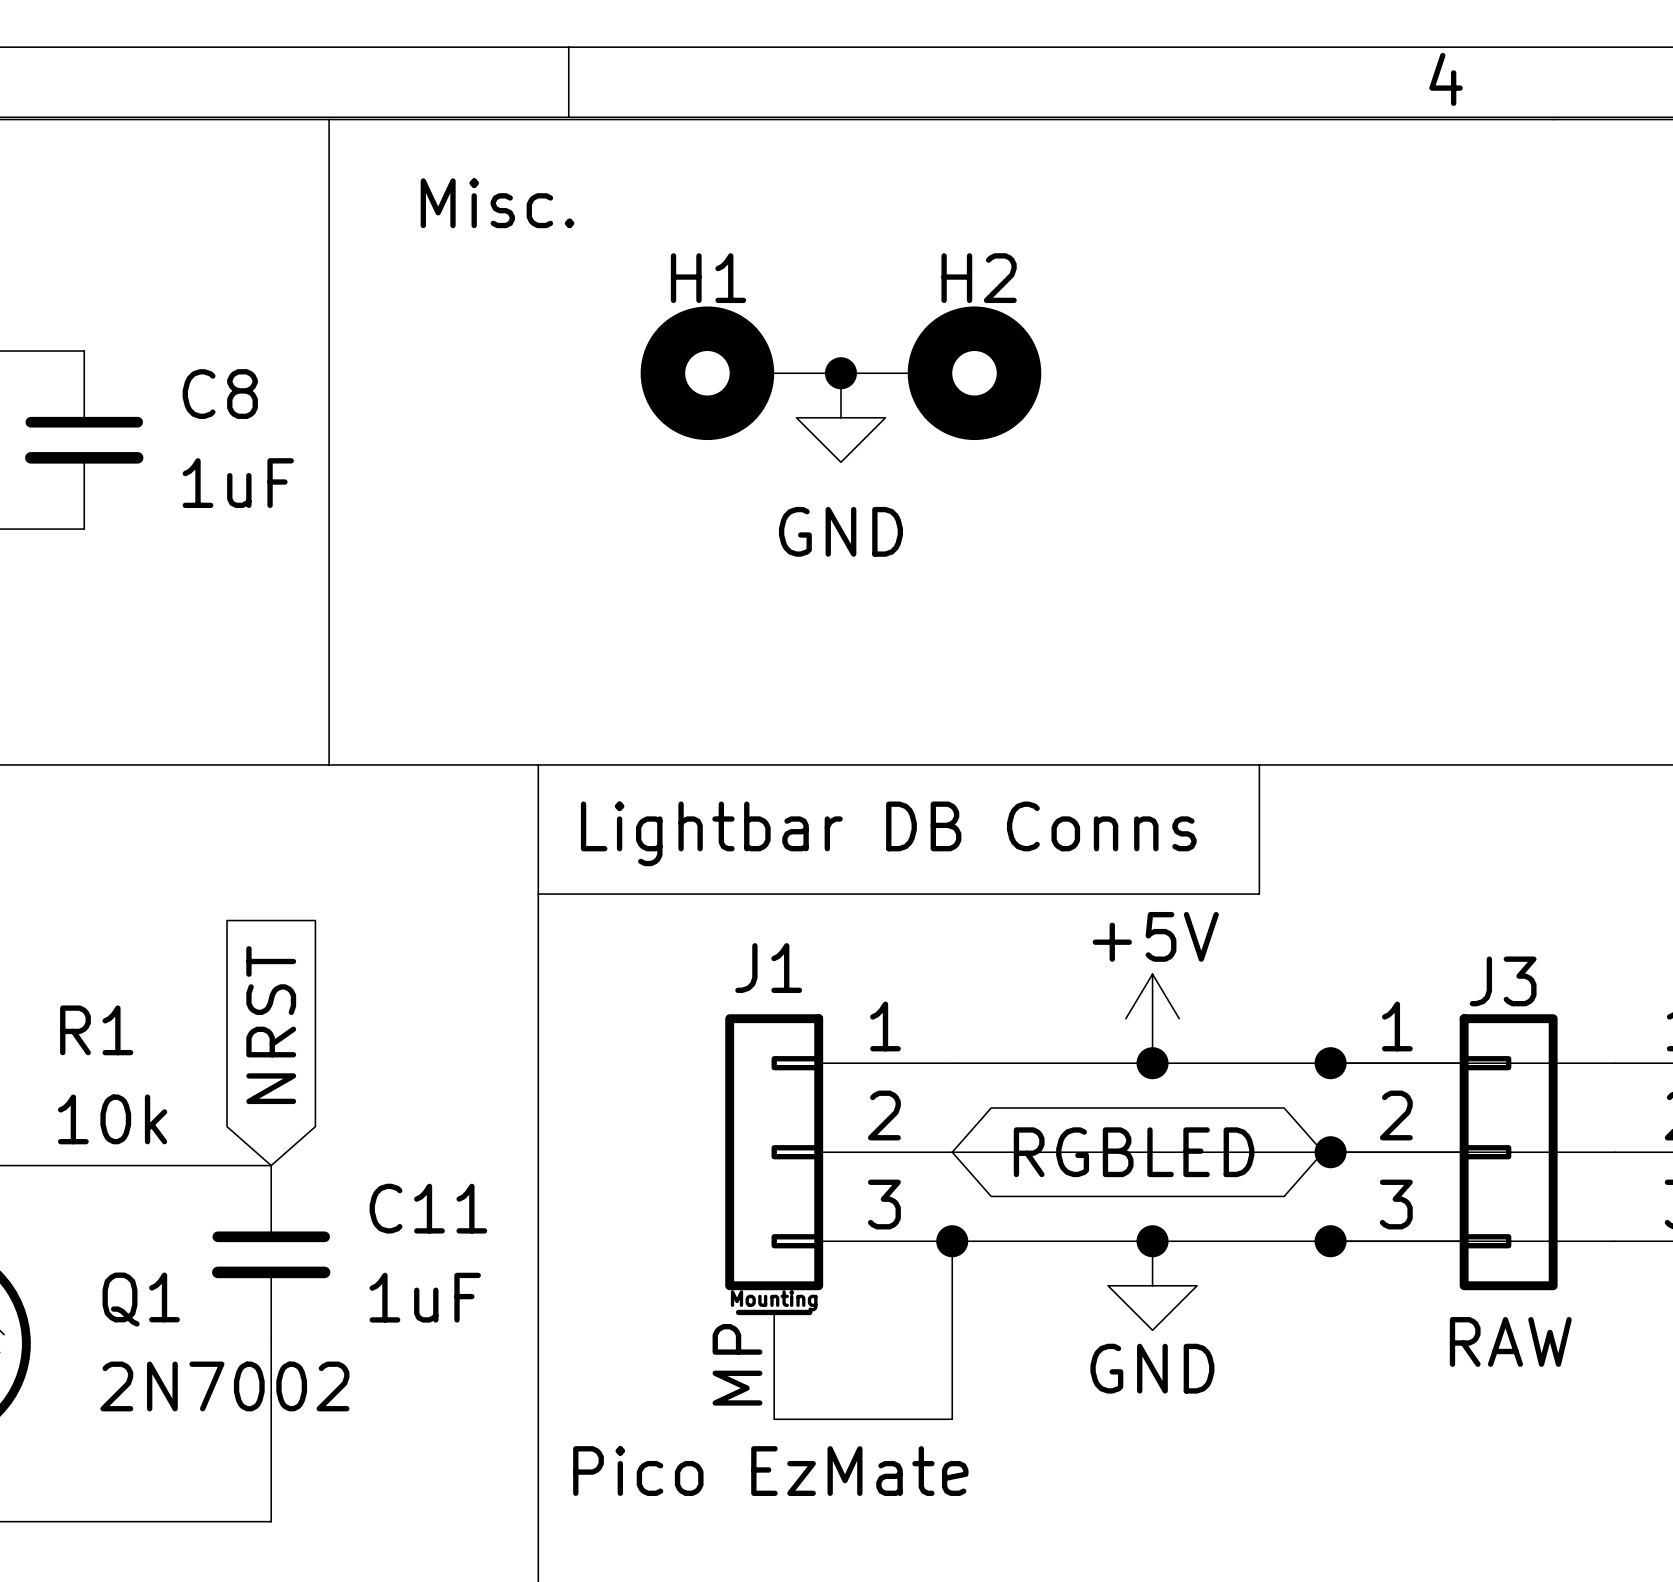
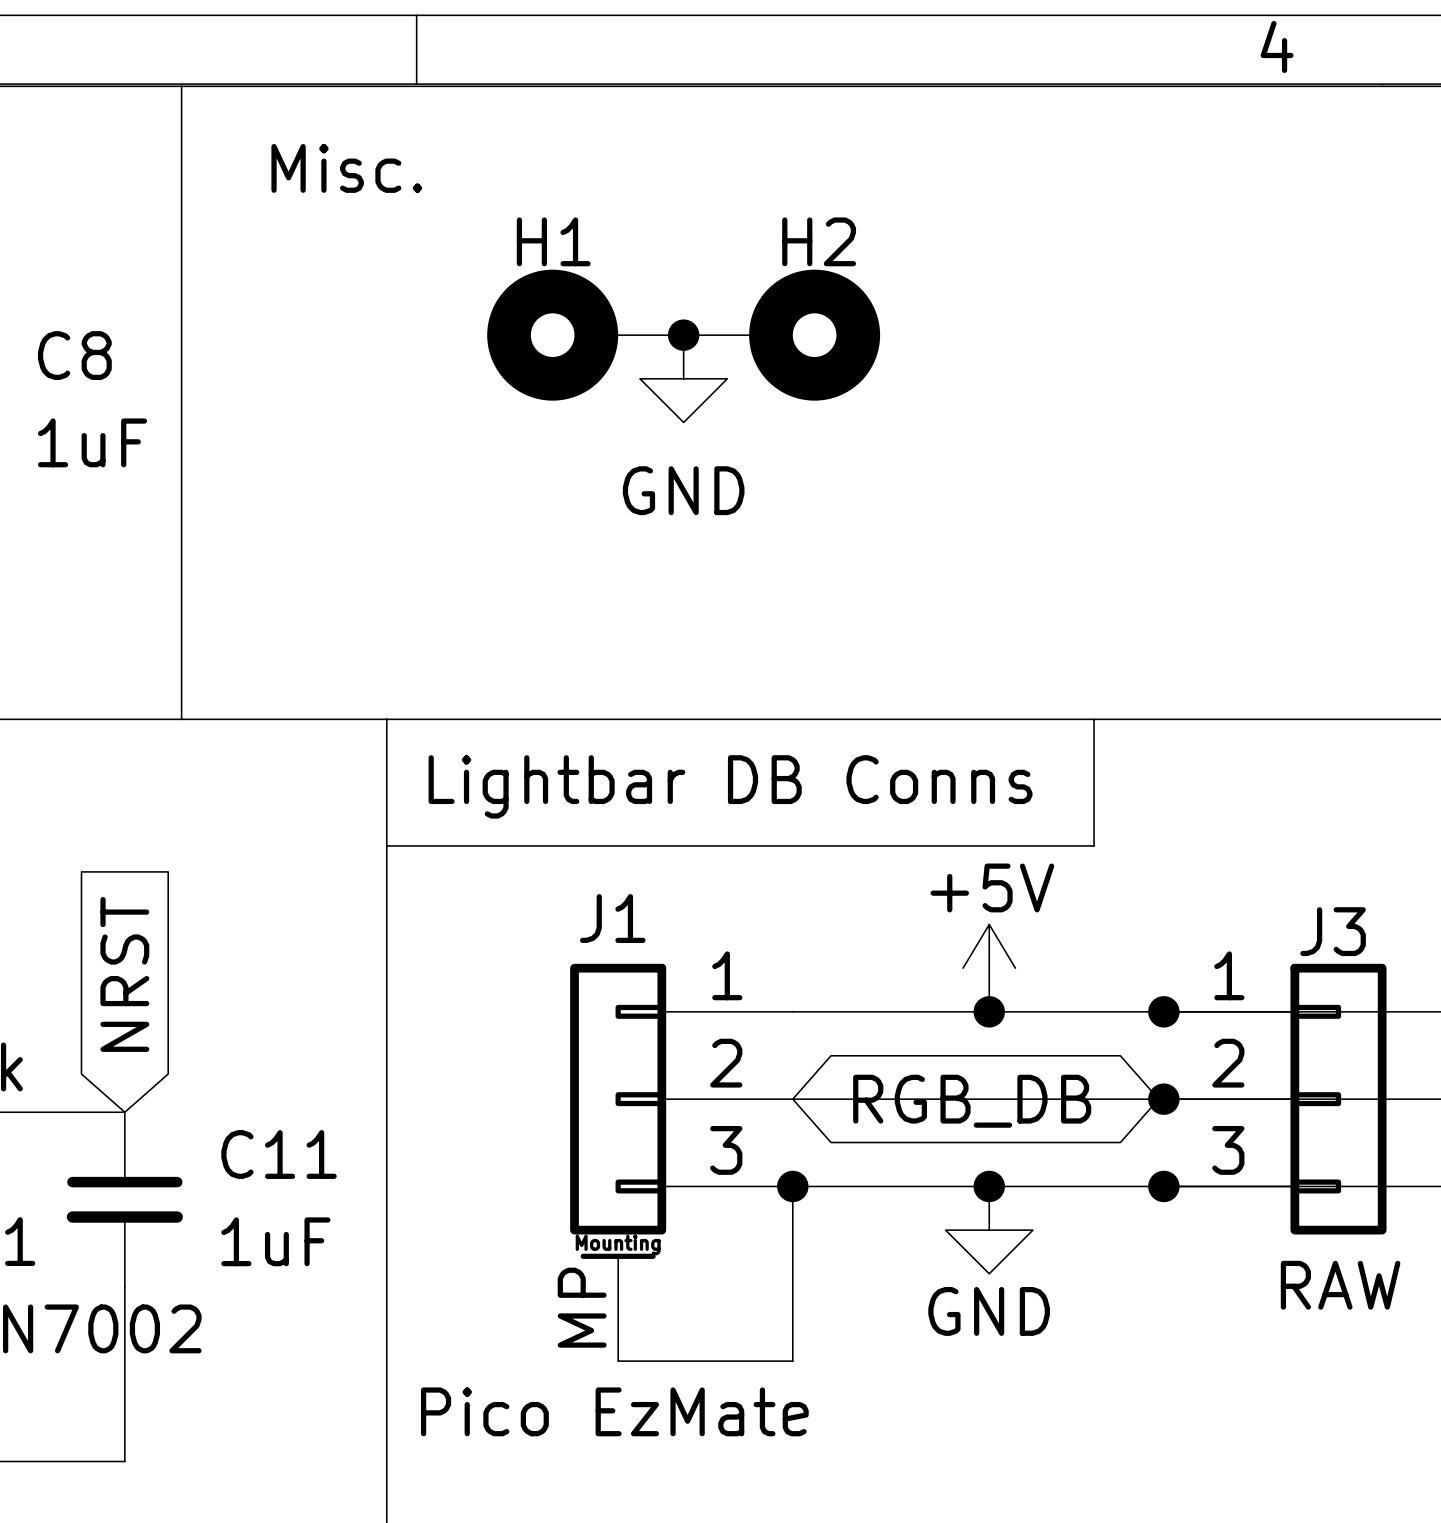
global label: RGBLED (1134, 1152) -> RGB_DB (972, 1101)

